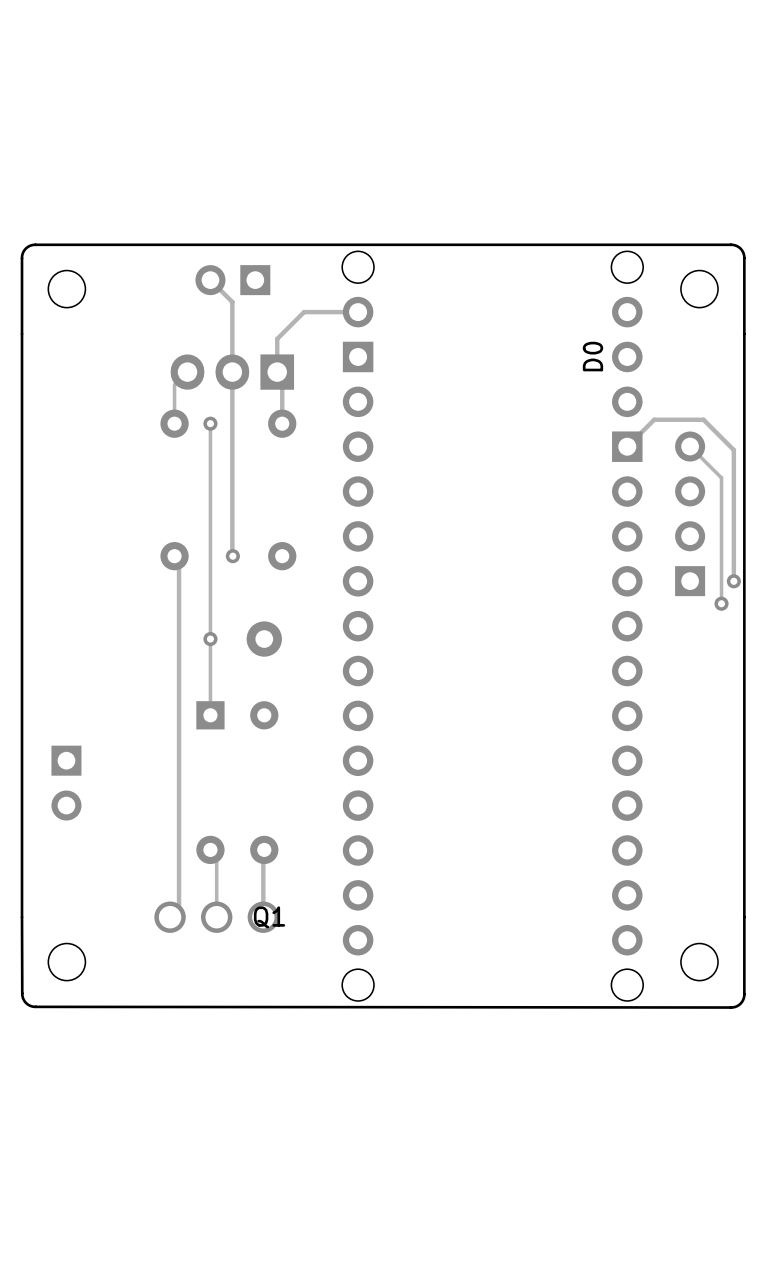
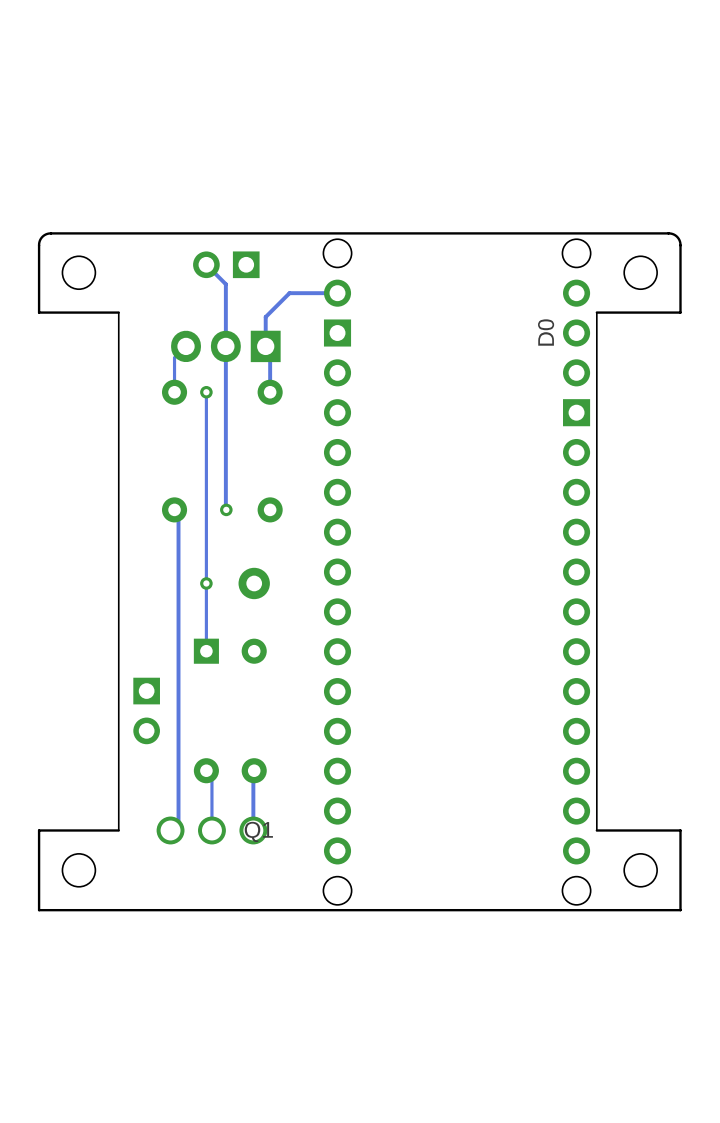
board edge: (22, 333) (22, 993) (26, 1003) (35, 1006) (730, 1007) (740, 1003) (744, 994) -> (39, 312) (118, 312) (118, 830) (39, 830) (39, 910) (680, 910) (680, 898)
board edge: (744, 333) (744, 917) -> (680, 312) (596, 312) (596, 830) (680, 830)
track: (627, 446) (654, 419) (703, 419) (733, 450) (733, 581) -> none
track: (690, 446) (721, 477) (721, 603) -> none
part: (690, 513) -> none
via: (733, 581) -> none
via: (721, 603) -> none
part position: (66, 783) -> (146, 710)

